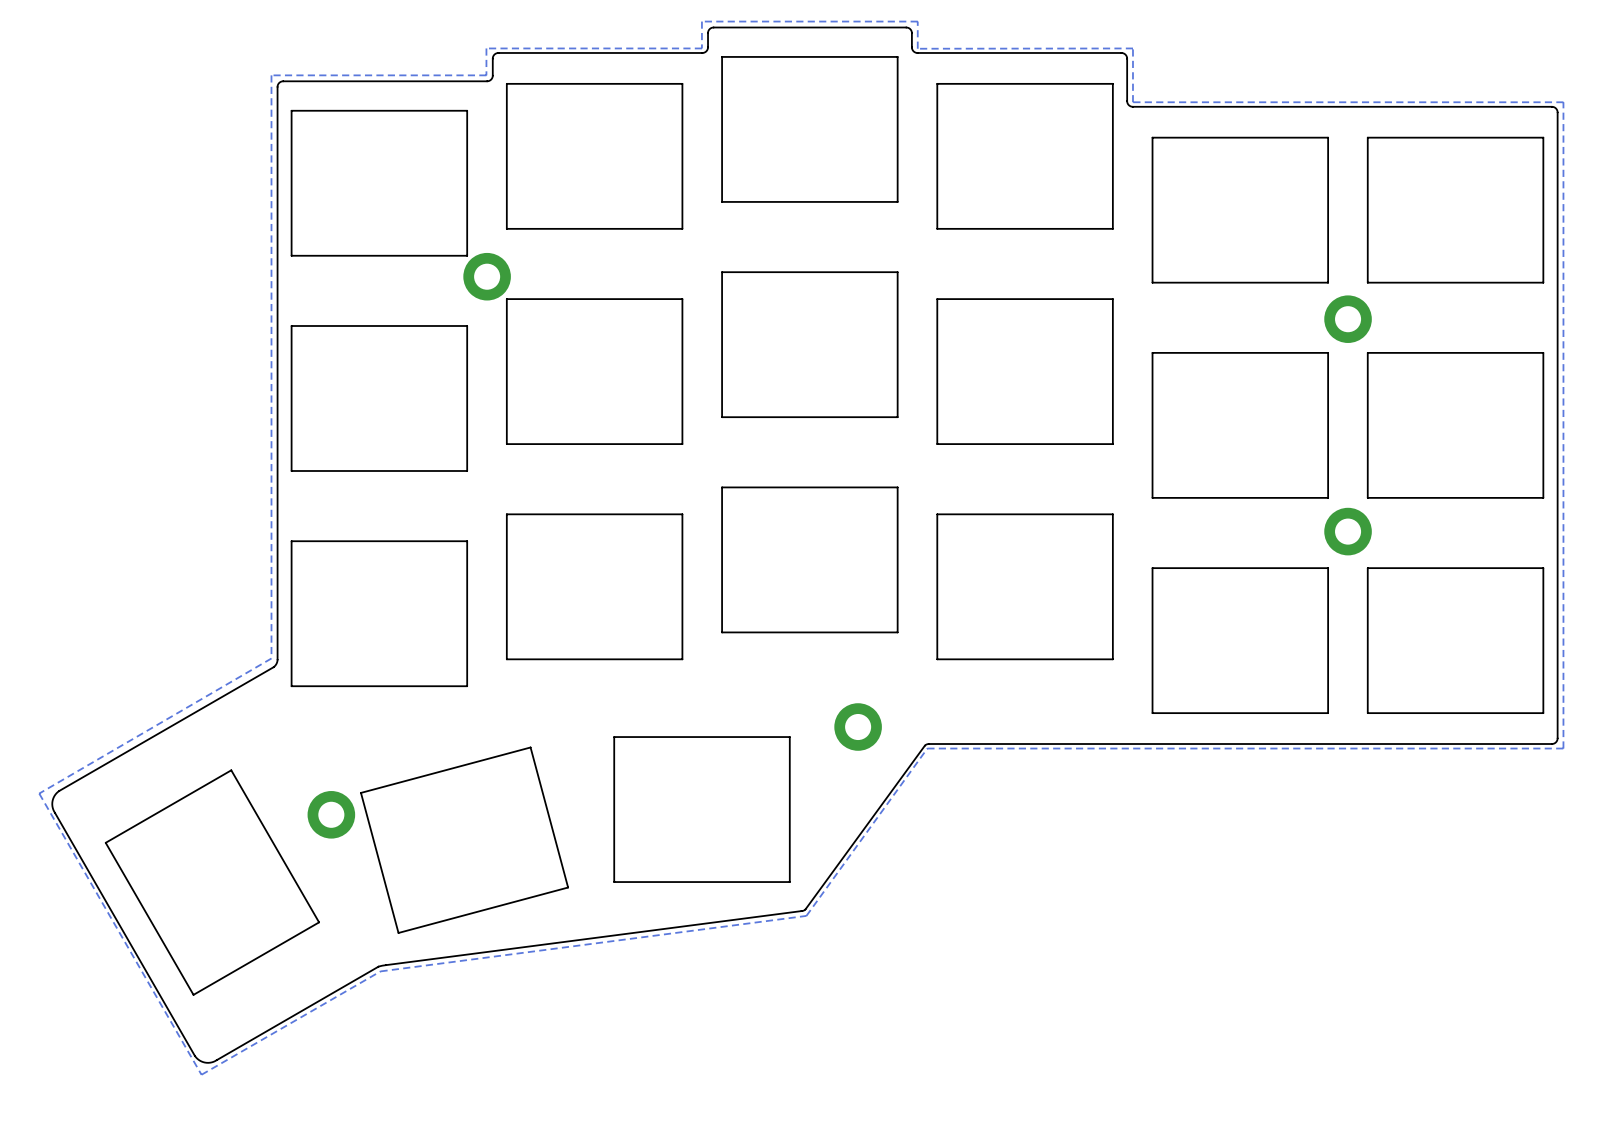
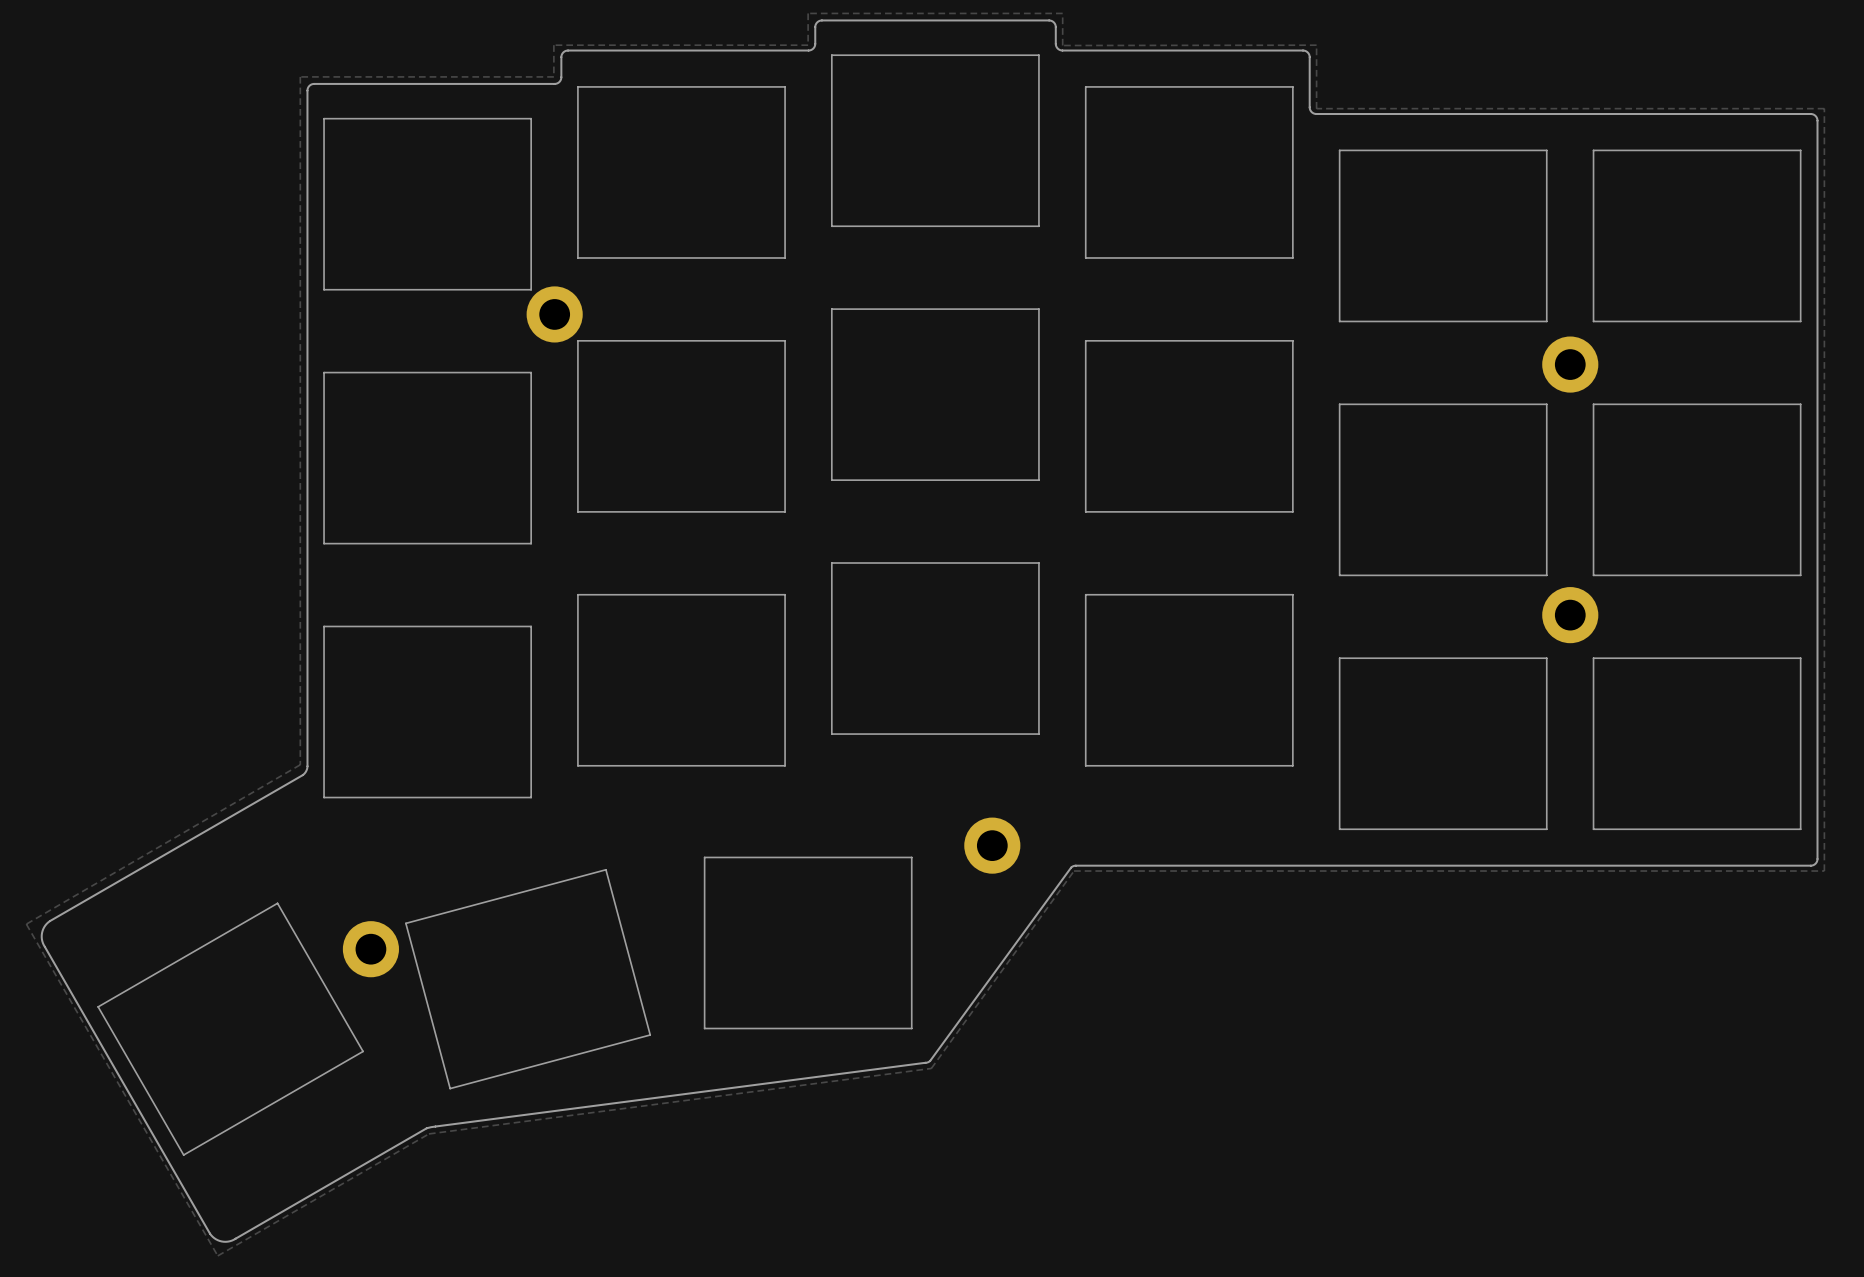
drawing shape: [105, 769, 320, 996] -> [97, 902, 364, 1156]

